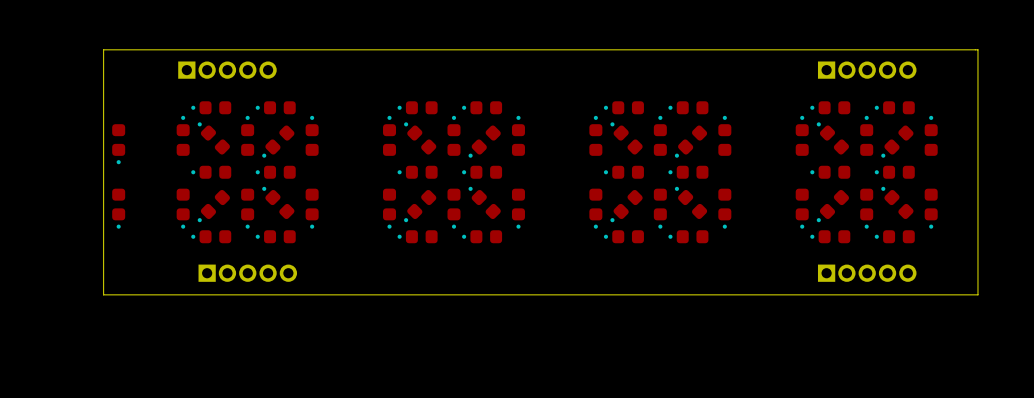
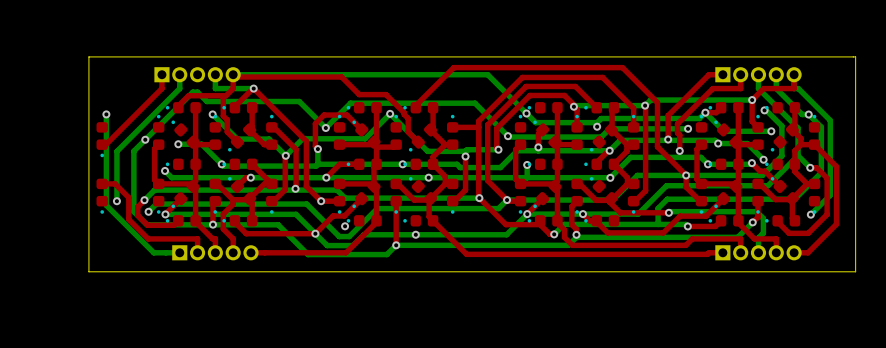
top track: none -> (161, 74) (161, 88) (105, 144) (102, 144)
bottom track: none -> (179, 74) (179, 88) (116, 151) (116, 201)
bottom track: none -> (215, 74) (215, 88) (253, 88)
top track: none -> (233, 74) (233, 88) (226, 95) (188, 95) (178, 107)
bottom track: none -> (233, 74) (487, 74) (535, 122) (597, 122)
top track: none -> (722, 74) (709, 74) (668, 115) (668, 139)
top track: none -> (740, 74) (740, 88) (712, 88) (677, 123) (679, 150)
bottom track: none -> (758, 74) (758, 88) (798, 128) (798, 155)
bottom track: none -> (776, 74) (776, 88) (802, 114) (808, 114) (821, 127) (821, 172) (794, 199) (667, 199) (658, 208) (658, 224)
top track: none -> (794, 74) (794, 88) (763, 88) (752, 100) (752, 121) (758, 127)
bottom track: none -> (794, 74) (794, 88) (798, 88) (830, 120) (830, 195) (810, 214)
top track: none -> (233, 77) (341, 77) (359, 94) (385, 94) (408, 118) (408, 131) (418, 142)
via: none -> (253, 88)
top track: none -> (223, 95) (223, 116) (227, 119) (227, 131) (237, 142)
bottom track: none -> (752, 100) (650, 100) (645, 105) (573, 106)
via: none -> (752, 100)
top track: none -> (645, 105) (645, 190) (633, 201)
via: none -> (645, 105)
via: none -> (573, 106)
top track: none -> (195, 107) (195, 139) (193, 142) (195, 144)
top track: none -> (234, 107) (253, 88) (306, 141) (306, 186) (321, 201) (339, 201)
top track: none -> (252, 107) (252, 127) (249, 129) (264, 144) (271, 144)
top track: none -> (376, 107) (376, 139) (374, 144)
top track: none -> (415, 107) (453, 67) (622, 67) (657, 102) (657, 146) (686, 175) (686, 187) (701, 201)
top track: none -> (433, 107) (433, 127) (430, 129) (445, 144)
top track: none -> (557, 107) (557, 139) (554, 142) (557, 144)
top track: none -> (596, 107) (575, 86) (526, 86) (487, 124) (487, 180) (508, 201) (520, 201)
top track: none -> (614, 107) (612, 109) (612, 129)
top track: none -> (721, 107) (716, 112) (705, 112)
top track: none -> (738, 107) (738, 139) (735, 142) (738, 144)
top track: none -> (794, 107) (794, 127) (792, 129) (800, 138) (800, 144)
bottom track: none -> (764, 110) (781, 126) (781, 156) (762, 175) (637, 175) (612, 200) (507, 200) (498, 208) (377, 208) (349, 236) (339, 236) (306, 204) (156, 204) (148, 211)
via: none -> (764, 110)
via: none -> (705, 112)
via: none -> (390, 113)
via: none -> (526, 113)
bottom track: none -> (106, 114) (106, 205) (153, 252) (179, 252)
via: none -> (106, 114)
bottom track: none -> (212, 114) (237, 139) (269, 139) (285, 155) (302, 138) (365, 138) (390, 113) (427, 151) (465, 151)
via: none -> (212, 114)
via: none -> (808, 114)
bottom track: none -> (597, 122) (601, 118) (699, 118) (705, 112) (724, 131) (771, 131)
via: none -> (597, 126)
top track: none -> (271, 127) (274, 127) (296, 149) (295, 188)
via: none -> (325, 127)
top track: none -> (452, 127) (478, 127)
top track: none -> (577, 127) (577, 109) (564, 95) (529, 95) (496, 128) (496, 147) (498, 149)
top track: none -> (633, 127) (633, 108) (602, 77) (522, 77) (478, 121) (478, 197) (505, 224) (540, 224)
bottom track: none -> (688, 128) (609, 128) (601, 137) (508, 137) (475, 103) (350, 103) (325, 127) (299, 101) (206, 101) (197, 92) (192, 92) (133, 151) (133, 211) (146, 224) (278, 224) (308, 254) (386, 254) (396, 245) (568, 245) (576, 237)
via: none -> (688, 128)
top track: none -> (361, 129) (346, 115) (324, 115) (315, 123) (315, 146) (317, 149)
top track: none -> (542, 129) (538, 134) (538, 147)
top track: none -> (612, 129) (626, 144)
via: none -> (771, 131)
via: none -> (507, 136)
via: none -> (145, 139)
via: none -> (668, 139)
via: none -> (718, 143)
top track: none -> (158, 144) (154, 148) (154, 179) (158, 183) (193, 183)
bottom track: none -> (178, 144) (201, 144) (223, 166) (316, 166) (317, 164)
via: none -> (178, 144)
top track: none -> (195, 144) (215, 144)
top track: none -> (195, 144) (195, 181) (193, 183)
top track: none -> (339, 144) (374, 144)
top track: none -> (374, 144) (376, 147) (393, 147) (396, 144)
top track: none -> (445, 144) (433, 156) (433, 164) (445, 176) (445, 183)
top track: none -> (520, 144) (515, 149) (515, 179) (520, 183) (554, 183)
top track: none -> (557, 144) (577, 144)
top track: none -> (557, 144) (557, 181) (554, 183)
top track: none -> (626, 144) (626, 151) (614, 164) (627, 177) (627, 183)
top track: none -> (701, 144) (697, 149) (697, 179) (701, 183) (735, 183)
top track: none -> (738, 144) (758, 144)
top track: none -> (738, 144) (738, 181) (735, 183)
top track: none -> (800, 144) (794, 150) (794, 171) (807, 183)
top track: none -> (800, 144) (814, 144) (836, 166) (836, 224) (807, 252) (794, 252)
top track: none -> (376, 147) (376, 164) (374, 166) (374, 186) (376, 188) (376, 222) (346, 252) (250, 252)
via: none -> (538, 147)
bottom track: none -> (317, 149) (317, 164)
via: none -> (317, 149)
bottom track: none -> (498, 149) (467, 149) (465, 151)
via: none -> (498, 149)
top track: none -> (609, 150) (596, 164)
via: none -> (609, 150)
via: none -> (679, 150)
top track: none -> (285, 155) (285, 189) (271, 201)
via: none -> (285, 155)
bottom track: none -> (798, 155) (768, 185) (666, 185) (638, 214) (527, 214) (506, 234) (363, 234) (353, 245) (327, 245) (296, 214) (165, 214)
bottom track: none -> (798, 155) (810, 167)
top track: none -> (465, 156) (465, 189) (452, 201)
via: none -> (465, 156)
bottom track: none -> (763, 159) (747, 143) (718, 143) (715, 140) (620, 140) (609, 150) (517, 150) (500, 167) (460, 167) (457, 164) (317, 164)
via: none -> (763, 159)
top track: none -> (751, 163) (760, 171) (764, 171) (780, 186)
bottom track: none -> (751, 163) (707, 164) (701, 157) (630, 157) (610, 177) (171, 177) (165, 170)
via: none -> (751, 163)
via: none -> (221, 164)
top track: none -> (252, 164) (271, 183)
top track: none -> (359, 164) (339, 164) (326, 177)
via: none -> (402, 164)
via: none -> (707, 164)
bottom track: none -> (527, 164) (527, 177)
via: none -> (527, 164)
top track: none -> (810, 167) (816, 167) (827, 178) (827, 214) (808, 233) (789, 233) (777, 220)
via: none -> (810, 167)
via: none -> (165, 170)
via: none -> (686, 175)
top track: none -> (250, 177) (246, 177) (237, 186)
via: none -> (250, 177)
via: none -> (326, 177)
via: none -> (428, 177)
via: none -> (610, 177)
top track: none -> (268, 180) (248, 199)
top track: none -> (102, 183) (115, 183) (128, 197) (128, 219) (148, 238) (197, 238) (197, 252)
top track: none -> (193, 183) (195, 188) (195, 221) (212, 238) (215, 238) (215, 252)
top track: none -> (215, 183) (232, 199)
top track: none -> (339, 183) (374, 183)
top track: none -> (396, 183) (414, 200) (429, 200)
top track: none -> (445, 183) (429, 200)
top track: none -> (554, 183) (557, 188) (557, 223) (564, 230) (564, 237) (572, 245) (685, 245) (692, 238) (740, 238) (740, 252)
top track: none -> (577, 183) (579, 183) (596, 200) (609, 200)
top track: none -> (627, 183) (609, 200)
top track: none -> (735, 183) (738, 188) (738, 222) (754, 238) (776, 238) (776, 252)
top track: none -> (758, 183) (775, 199) (792, 199)
top track: none -> (807, 183) (792, 198) (792, 218) (794, 220)
via: none -> (295, 188)
bottom track: none -> (479, 198) (345, 198) (337, 190) (154, 190) (144, 200)
via: none -> (479, 198)
top track: none -> (180, 198) (165, 214)
top track: none -> (361, 198) (344, 215) (333, 215) (315, 233) (246, 233) (234, 220)
top track: none -> (542, 198) (527, 214)
top track: none -> (723, 198) (706, 216) (680, 216) (663, 232) (607, 232) (596, 220) (589, 220) (582, 214)
top track: none -> (232, 199) (232, 204) (223, 214) (223, 229) (233, 238) (233, 252)
top track: none -> (232, 199) (248, 199)
top track: none -> (248, 199) (252, 203) (252, 220)
top track: none -> (144, 200) (137, 206) (137, 215) (147, 225) (173, 225) (178, 220)
via: none -> (144, 200)
top track: none -> (429, 200) (429, 216) (466, 254) (722, 252)
via: none -> (507, 200)
top track: none -> (609, 200) (620, 212) (668, 212)
via: none -> (116, 201)
top track: none -> (215, 201) (212, 203) (212, 224)
via: none -> (321, 201)
top track: none -> (396, 201) (396, 245)
top track: none -> (577, 201) (571, 206) (571, 224) (576, 229) (576, 234)
top track: none -> (758, 201) (758, 217) (752, 222)
via: none -> (148, 211)
bottom track: none -> (668, 212) (756, 211) (763, 218) (763, 233) (758, 237) (758, 252)
via: none -> (668, 212)
via: none -> (165, 214)
via: none -> (527, 214)
via: none -> (582, 214)
via: none -> (810, 214)
top track: none -> (721, 220) (715, 226) (687, 226)
bottom track: none -> (752, 222) (737, 237) (576, 237)
via: none -> (752, 222)
via: none -> (212, 224)
top track: none -> (540, 224) (549, 234) (554, 234)
via: none -> (345, 226)
bottom track: none -> (687, 226) (685, 224) (564, 224) (554, 234)
via: none -> (687, 226)
via: none -> (315, 233)
via: none -> (415, 234)
via: none -> (554, 234)
via: none -> (576, 234)
via: none -> (396, 245)

